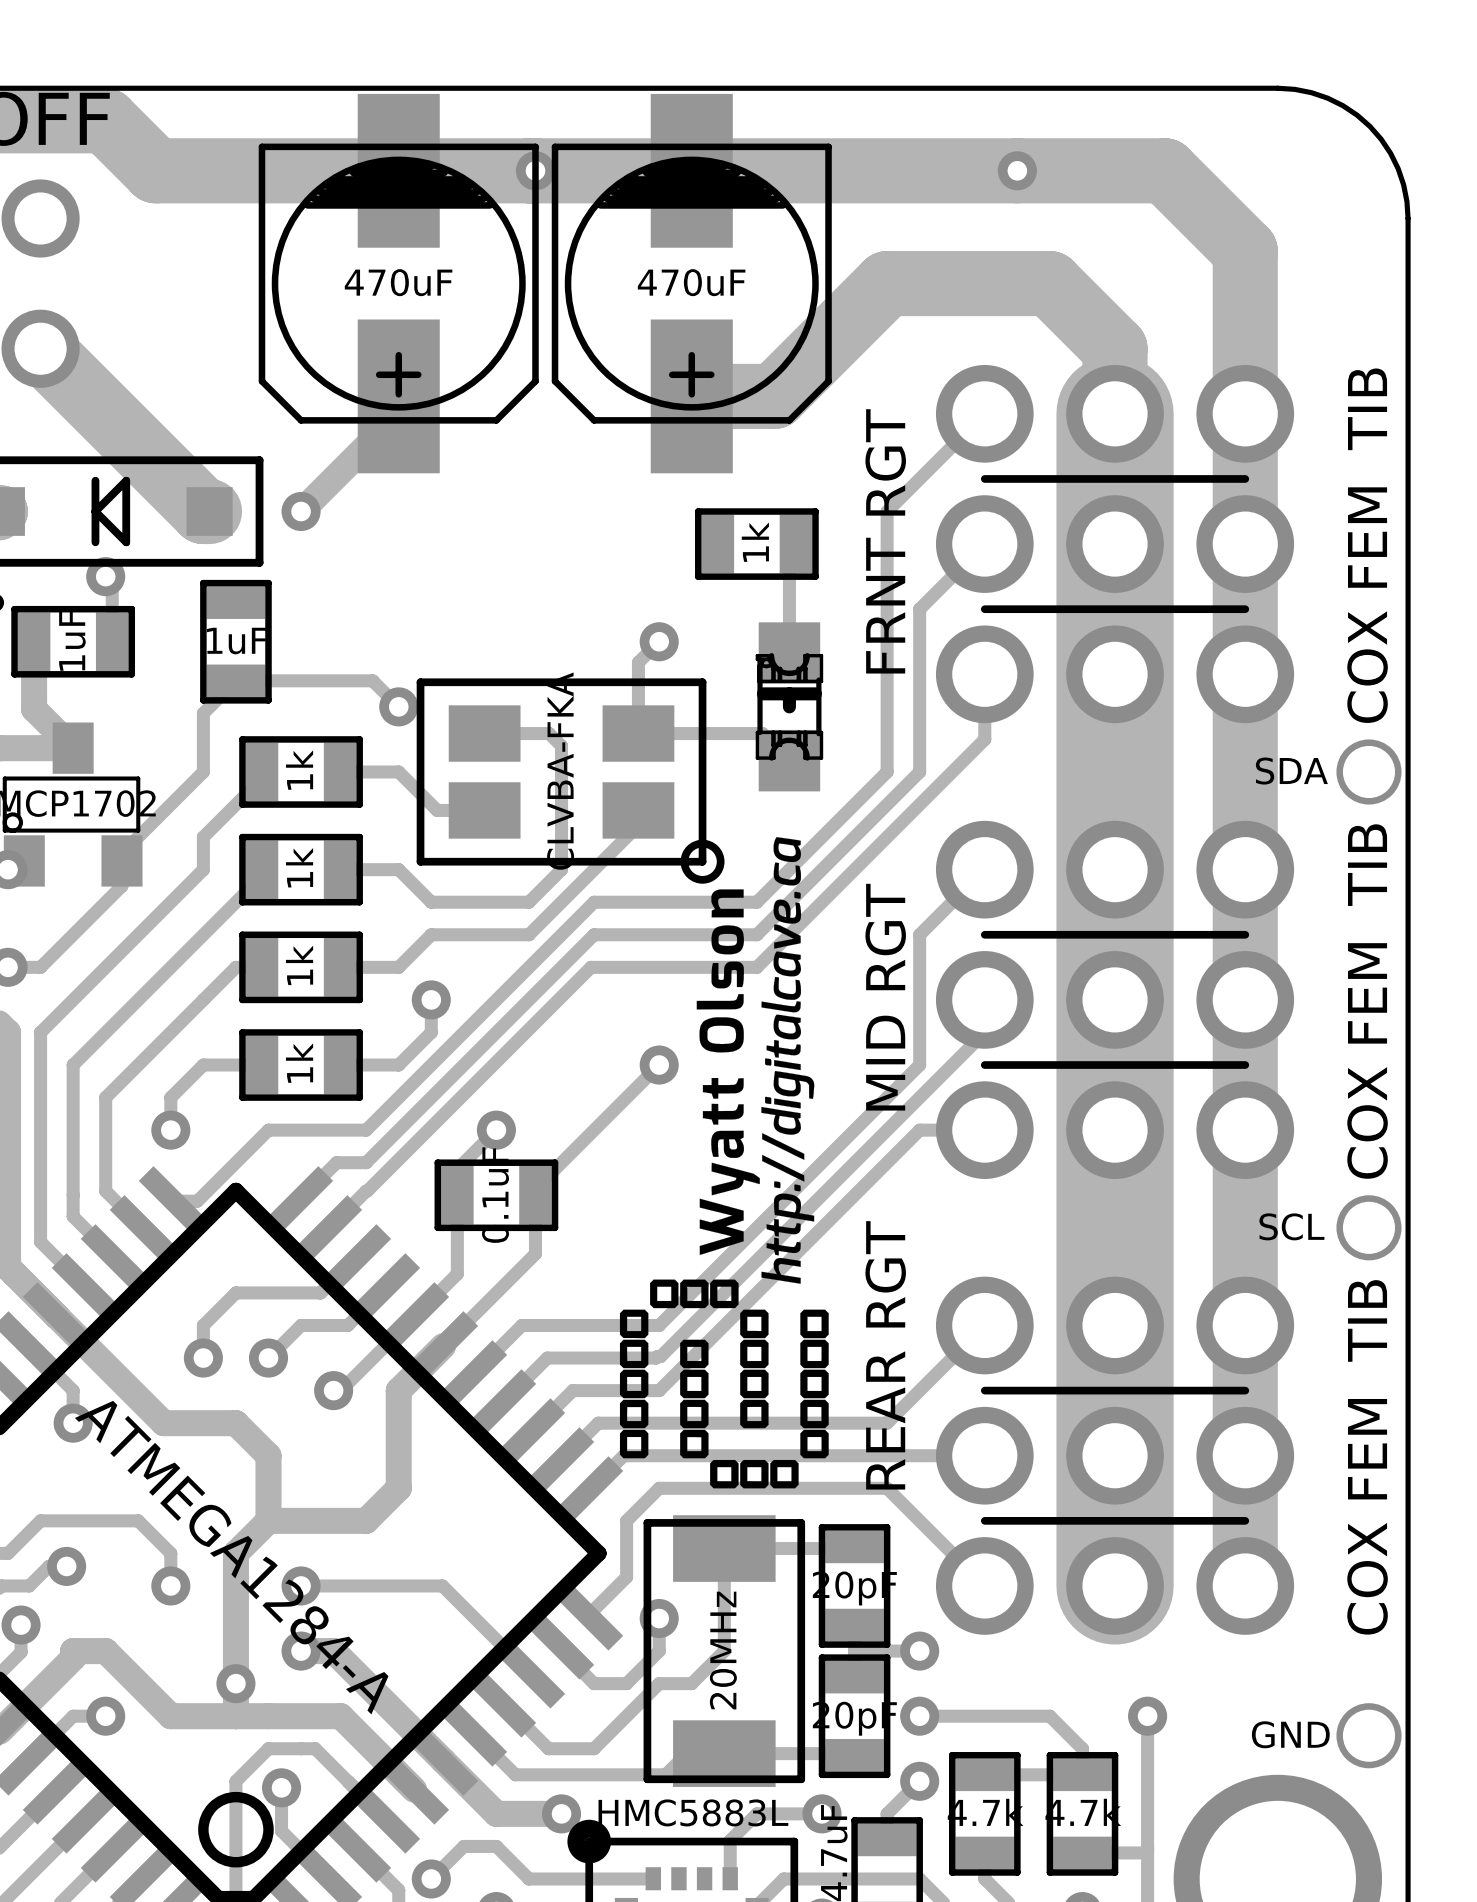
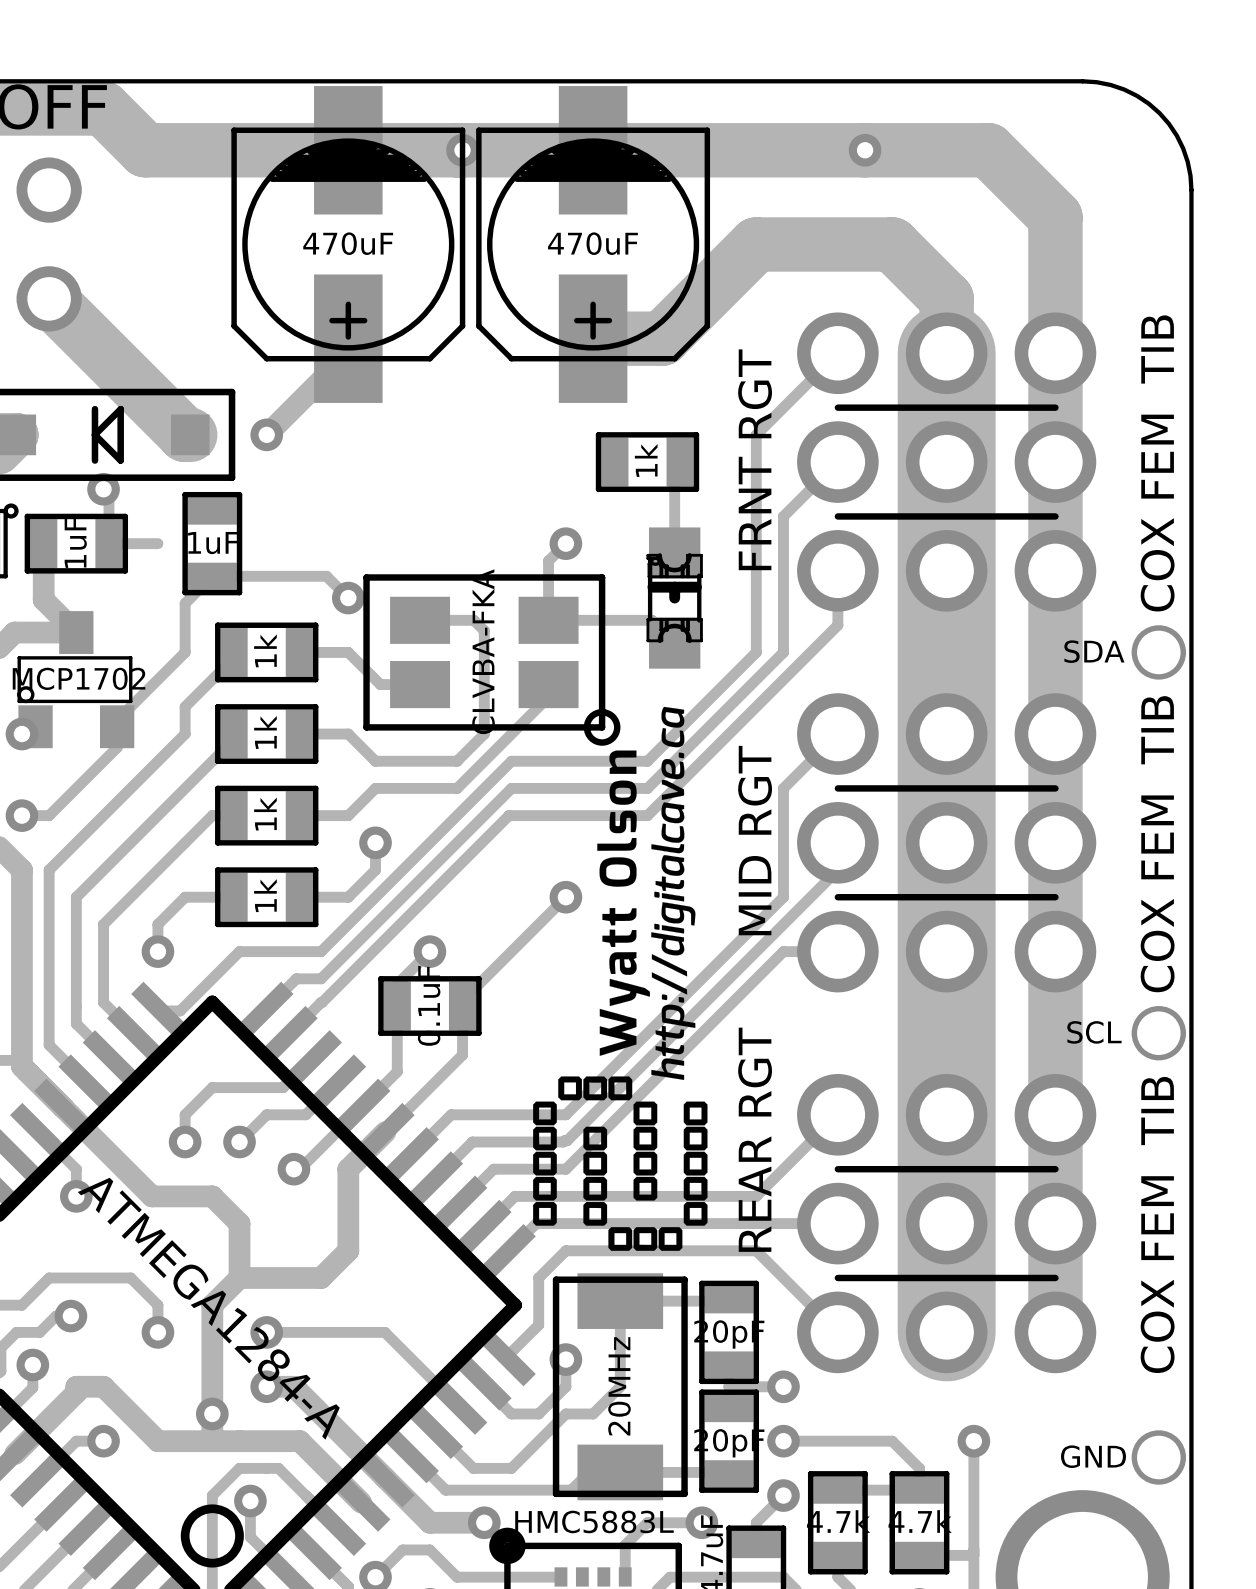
track: none -> (108, 543) (157, 543)

